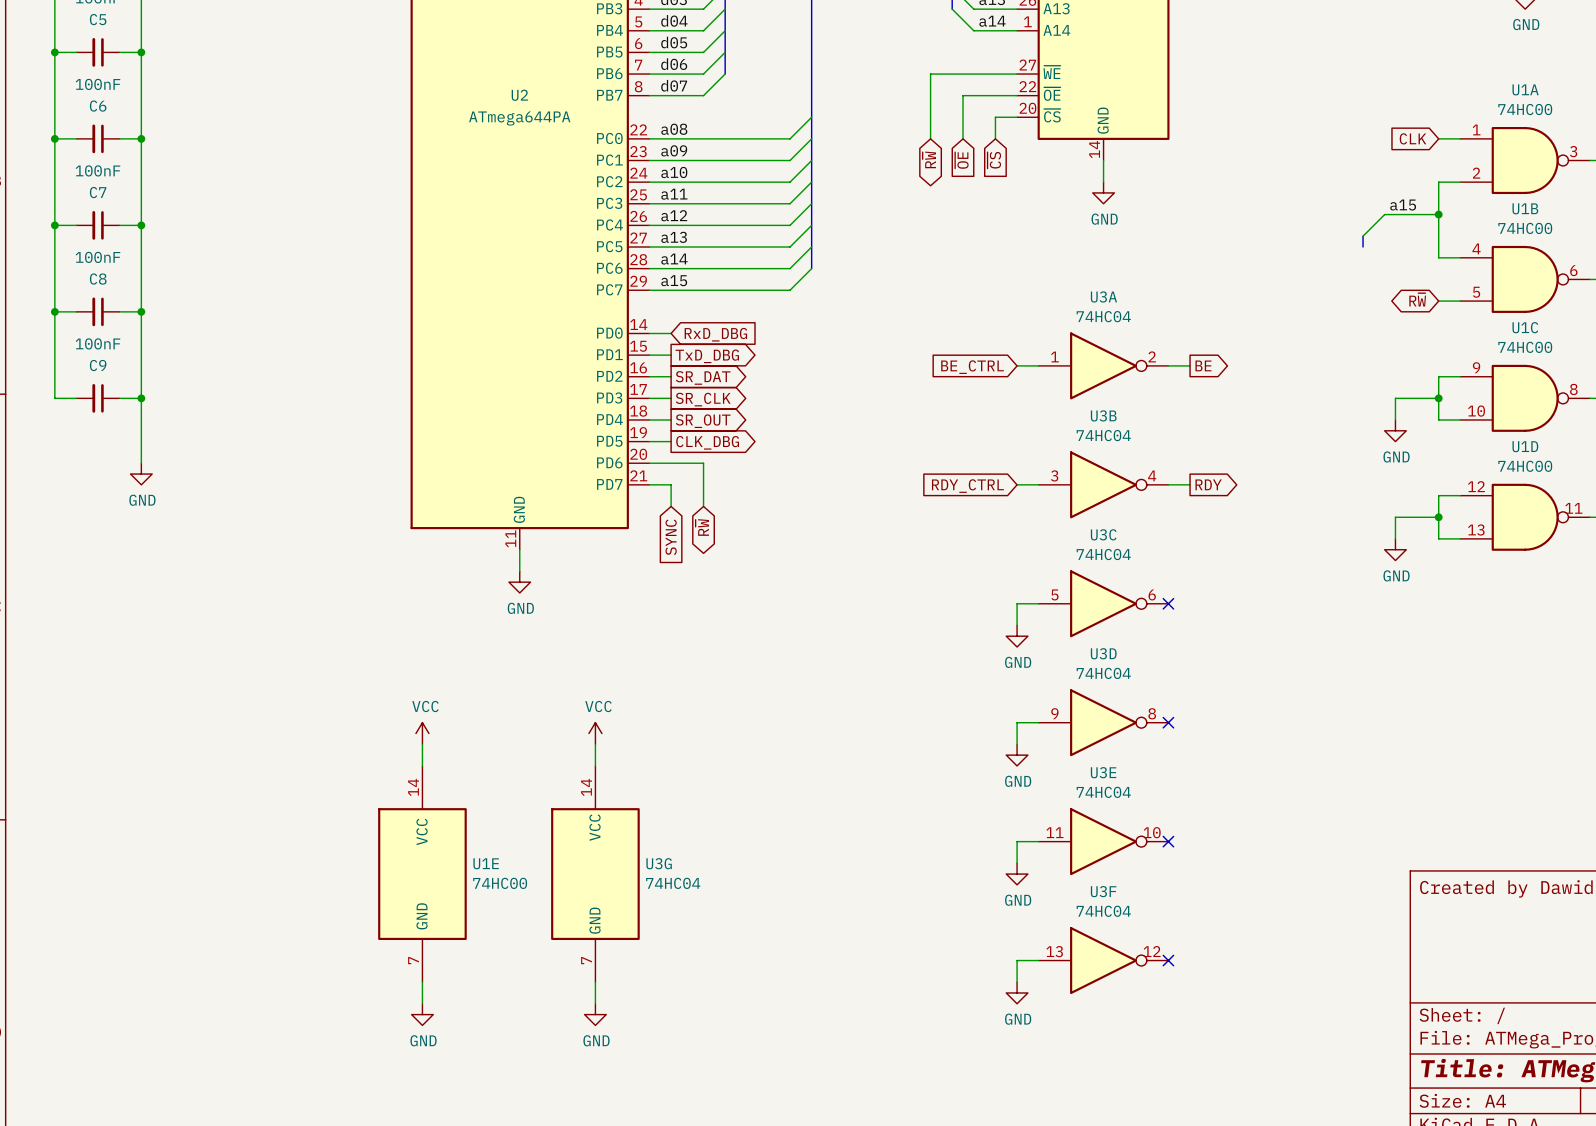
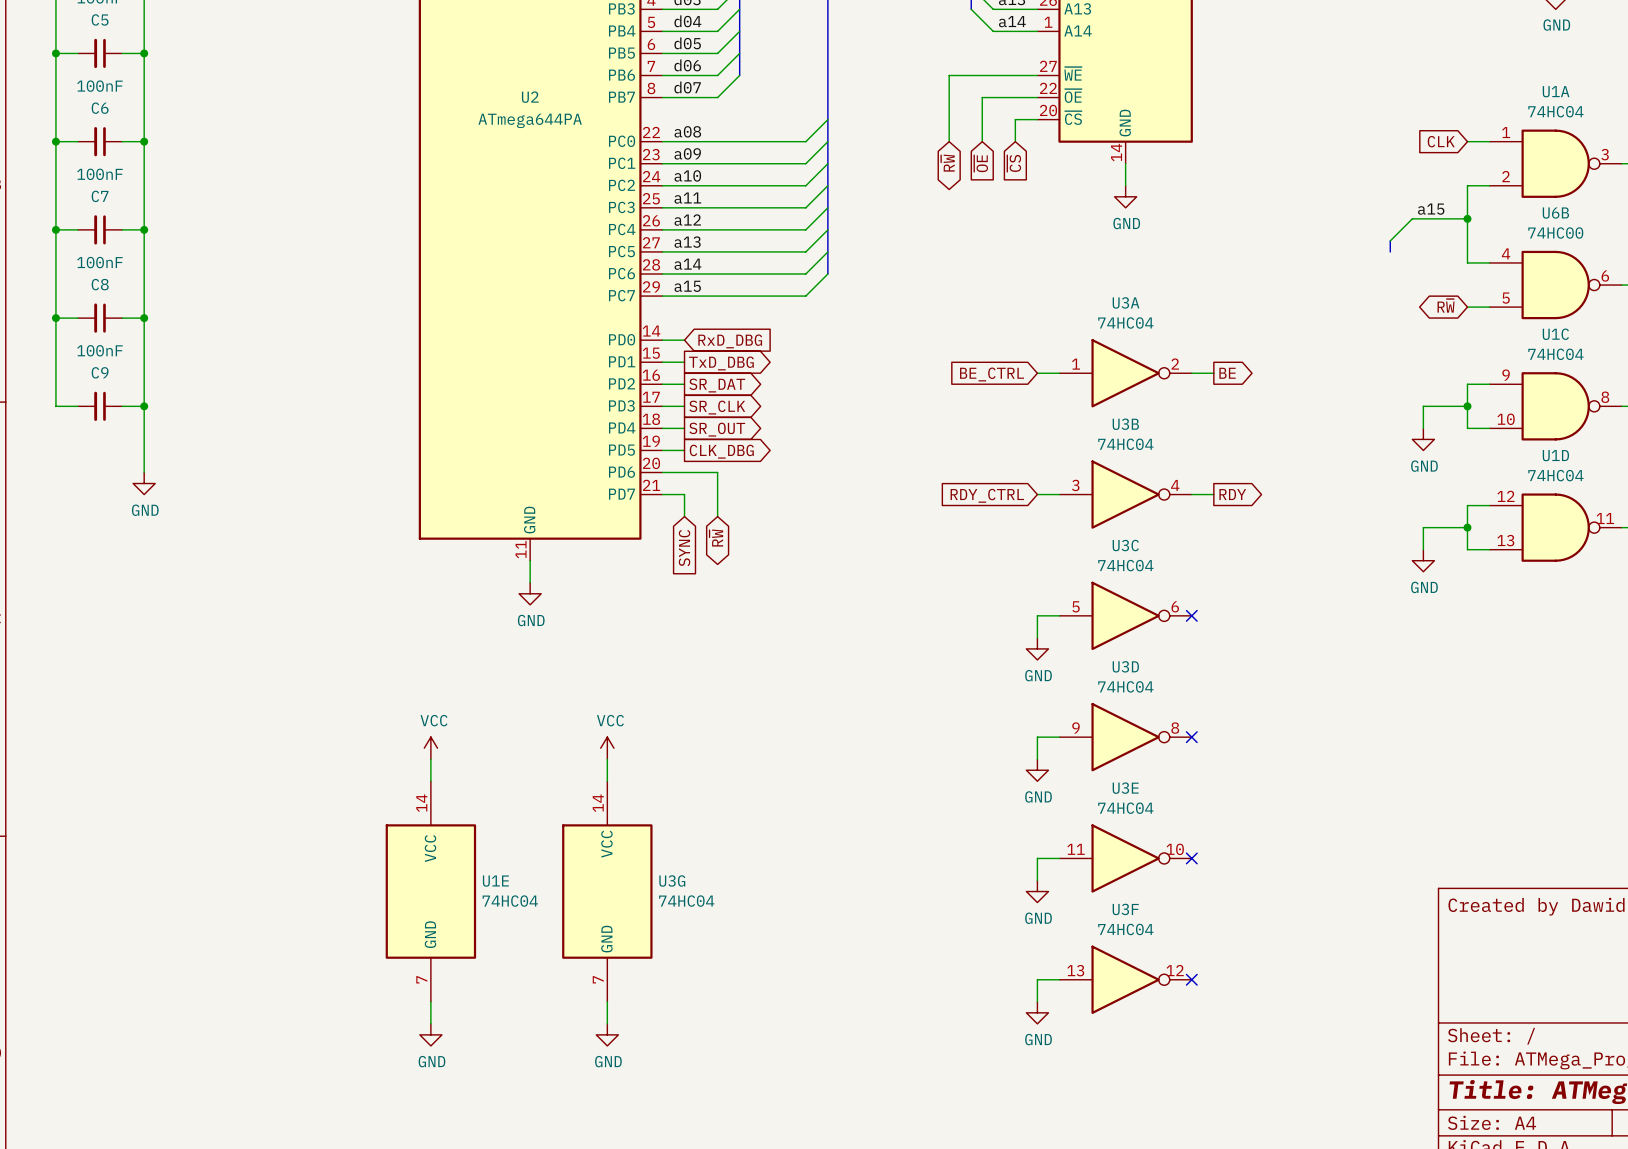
U1A value: 74HC00 (1525, 109) -> 74HC04 (1555, 111)
U1B name: U1B (1525, 208) -> U6B (1555, 213)
U1C value: 74HC00 (1525, 347) -> 74HC04 (1555, 354)
U1D value: 74HC00 (1525, 466) -> 74HC04 (1555, 475)
U1E value: 74HC00 (500, 883) -> 74HC04 (510, 901)

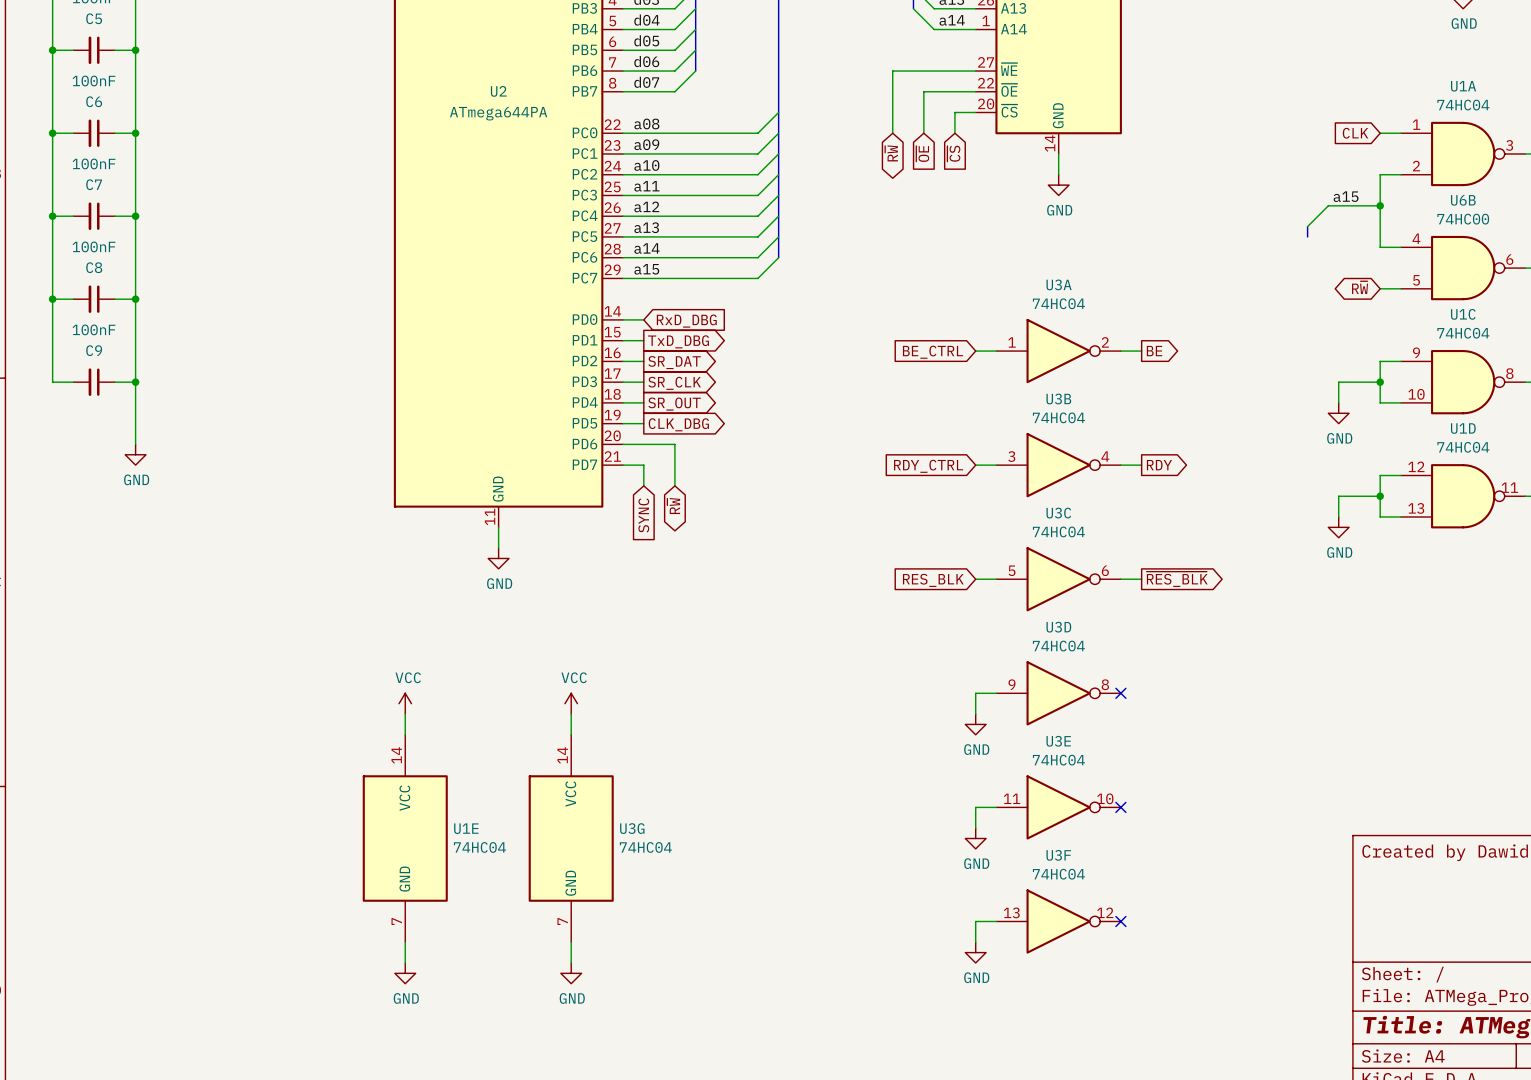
wire: (1037, 615) (1037, 637) -> none
wire: none -> (1120, 579) (1141, 579)
no-connect mark: (1191, 615) -> none
global label: none -> ~{RES_BLK} (1177, 579)
global label: none -> RES_BLK (933, 580)
power symbol: GND (1037, 648) -> none

